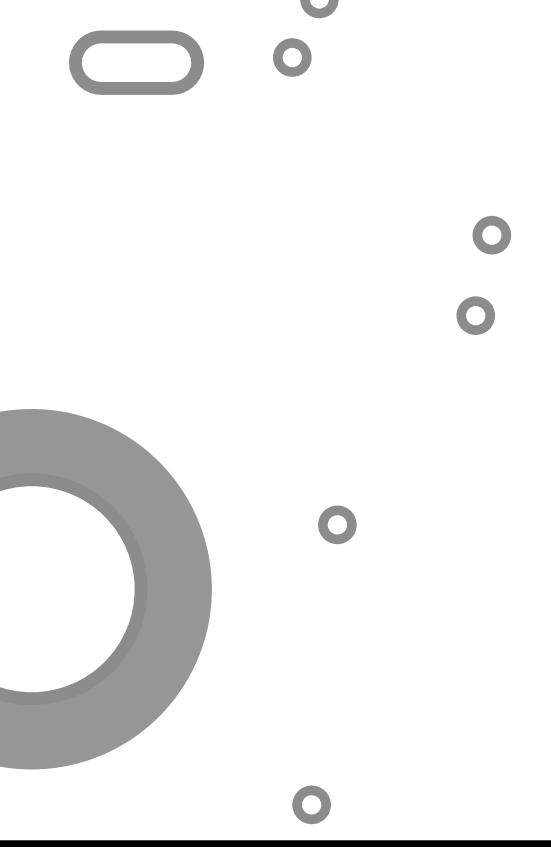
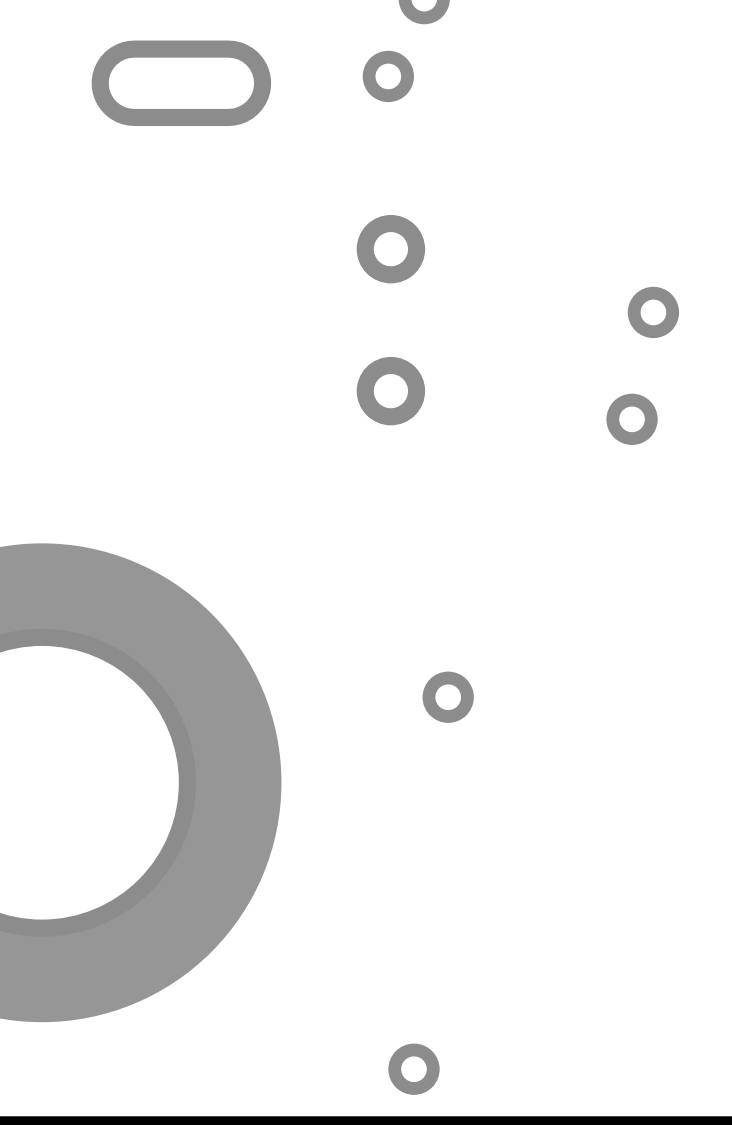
via: none -> (390, 249)
via: none -> (390, 391)

